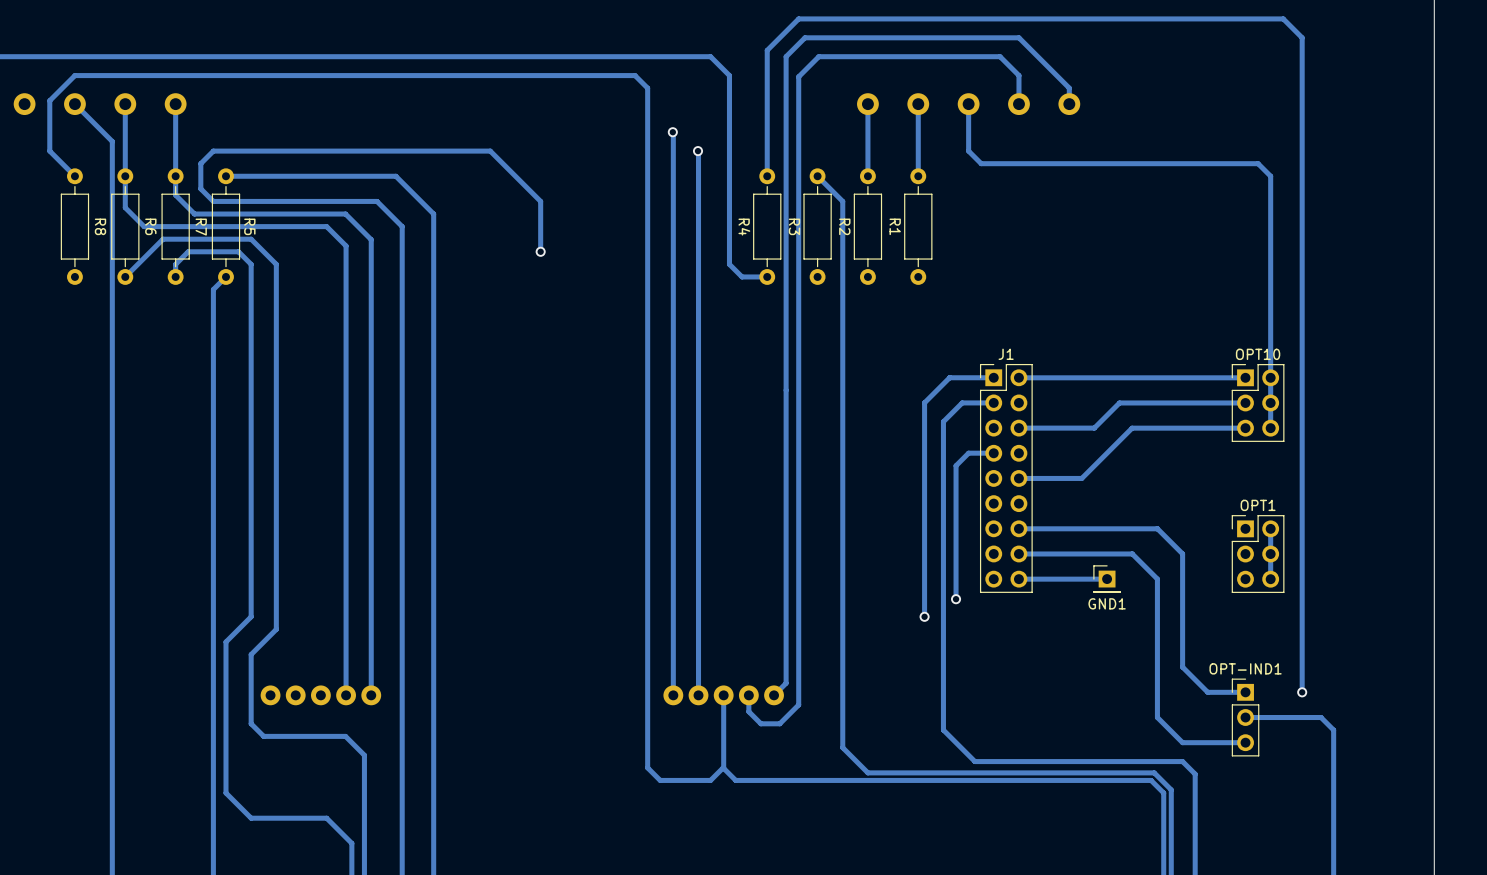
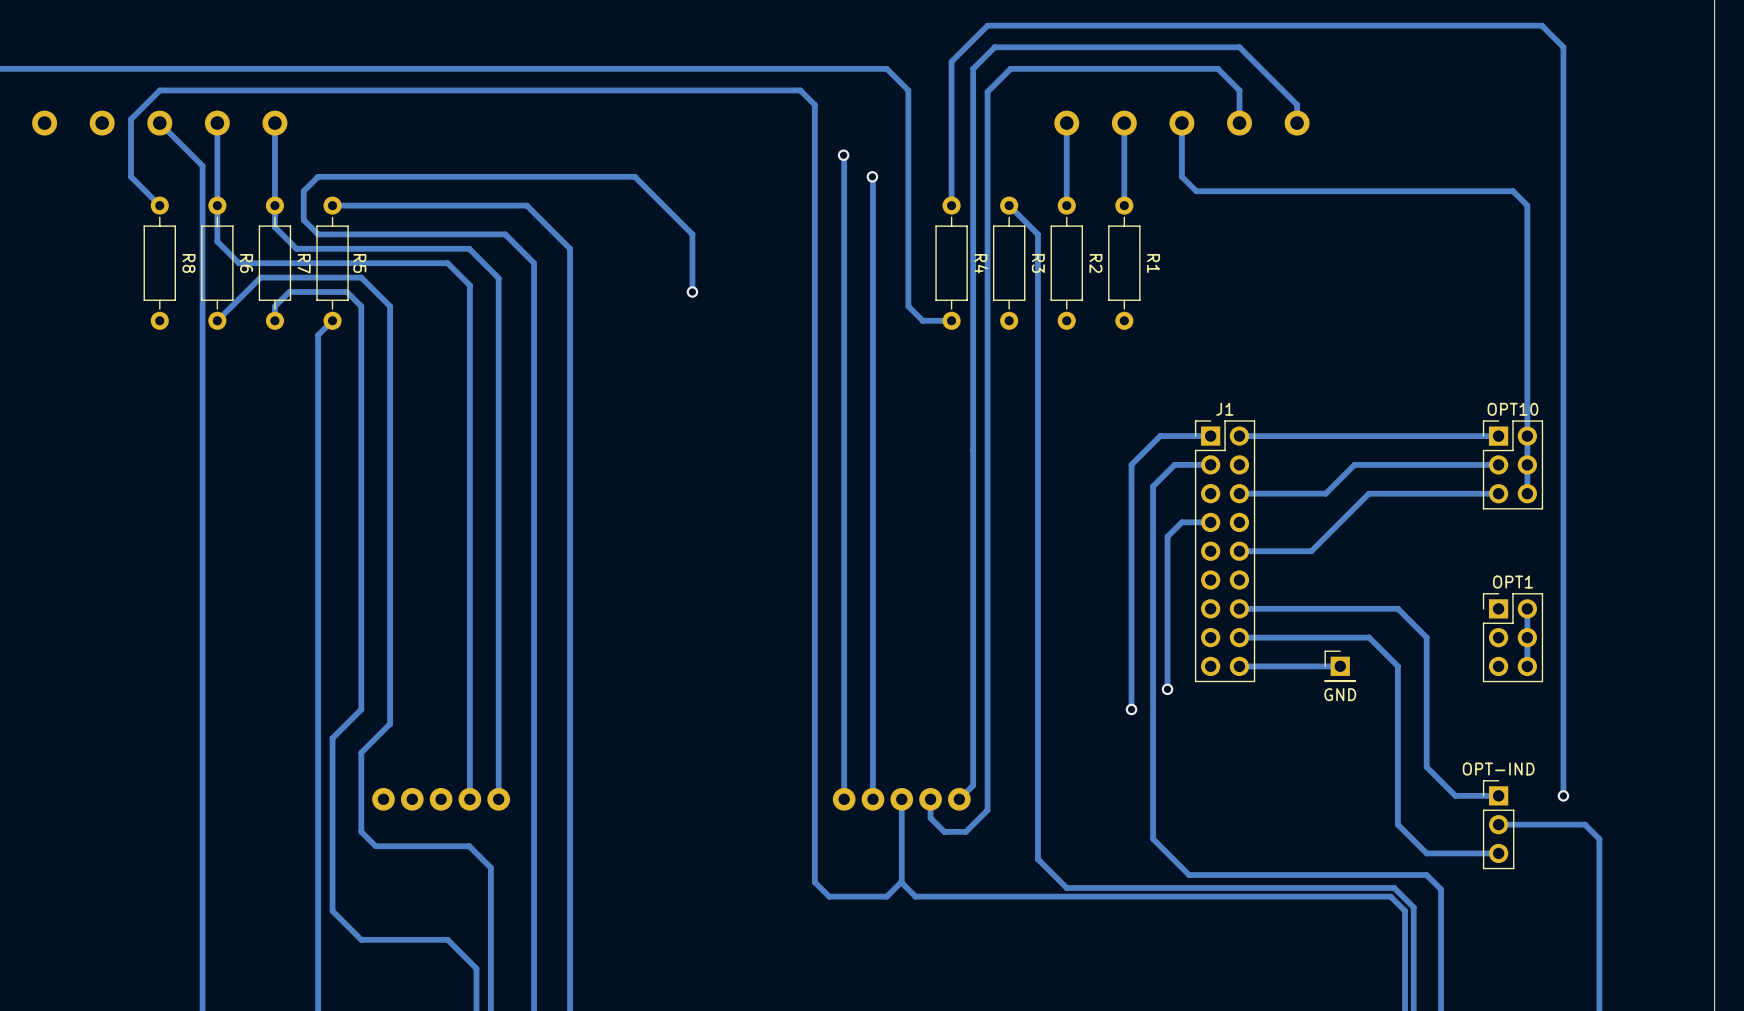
R3 name position: R3 (794, 226) -> R3 (1038, 263)
R2 name position: R2 (844, 226) -> R2 (1095, 263)
R1 name position: R1 (895, 226) -> R1 (1153, 263)
R4 name position: R4 (744, 227) -> R4 (981, 263)
GND1 name: GND1 (1107, 603) -> GND (1340, 694)
OPT-IND1 name: OPT-IND1 (1245, 668) -> OPT-IND (1498, 769)

